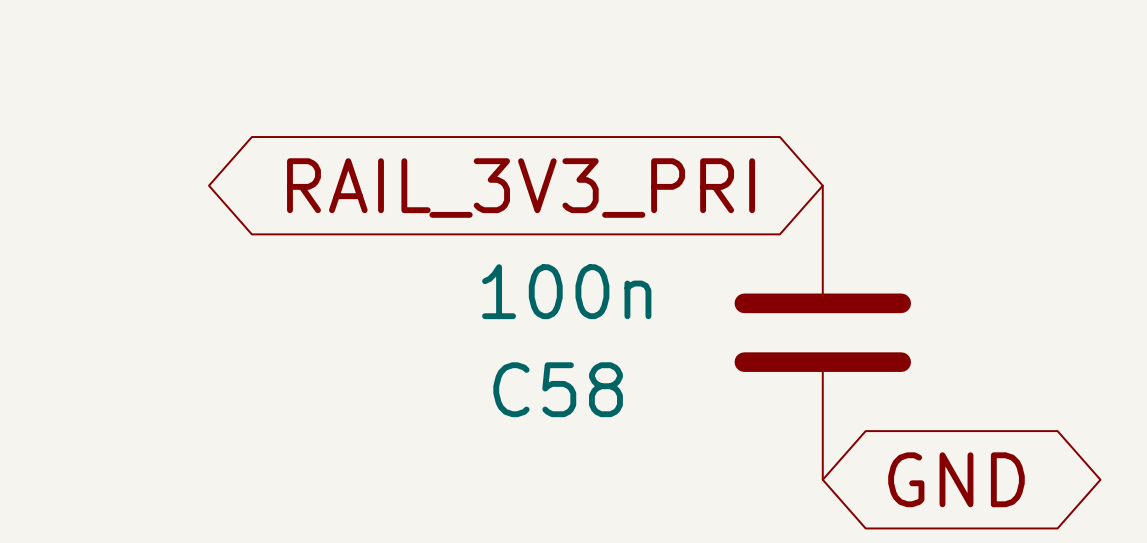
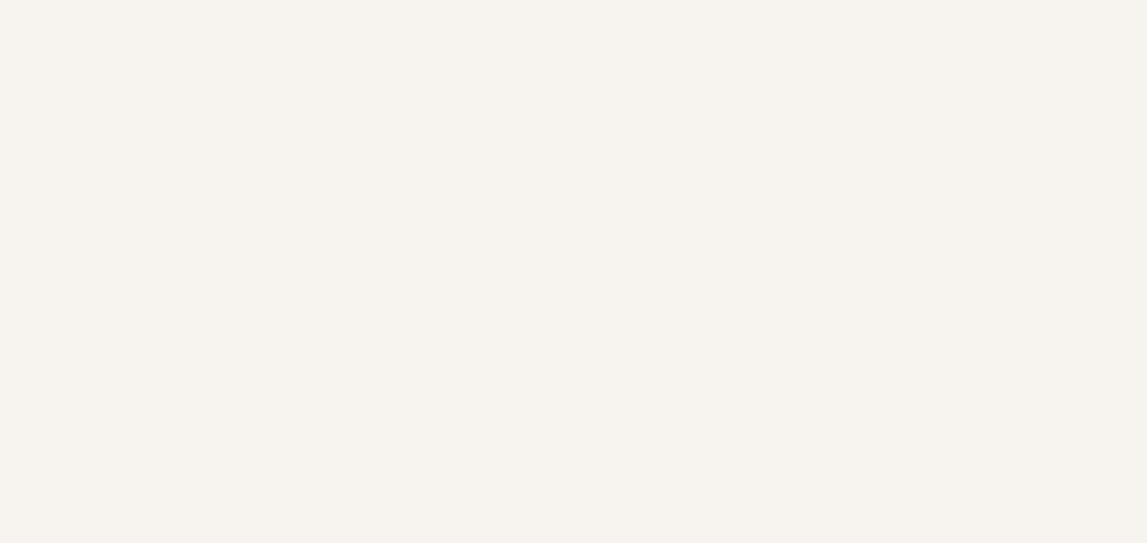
global label: RAIL_3V3_PRI (521, 188) -> none
C58: 100n (822, 332) -> none
global label: GND (956, 479) -> none

